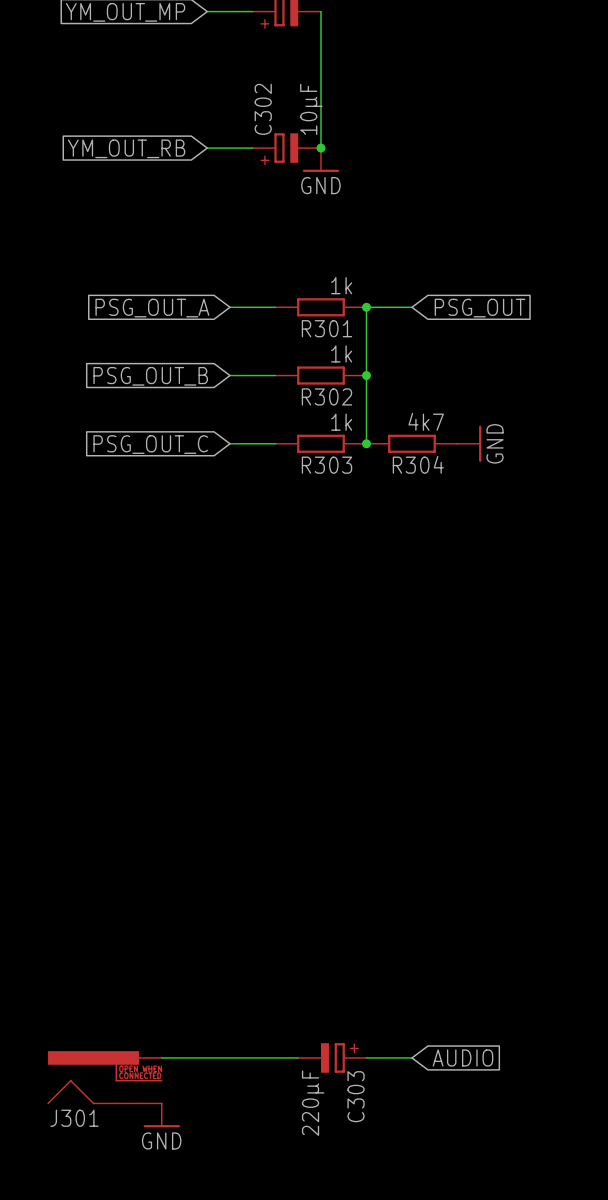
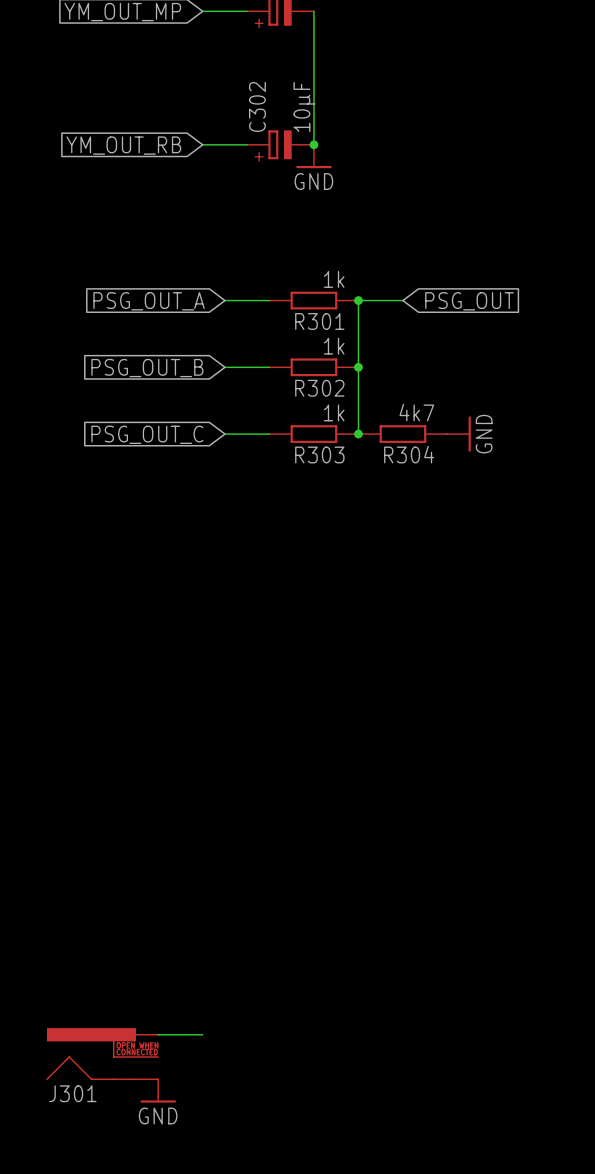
wire: (207, 1057) (298, 1057) -> none
C303: 220µF (332, 1057) -> none
wire: (366, 1057) (411, 1057) -> none
global label: AUDIO (462, 1057) -> none

